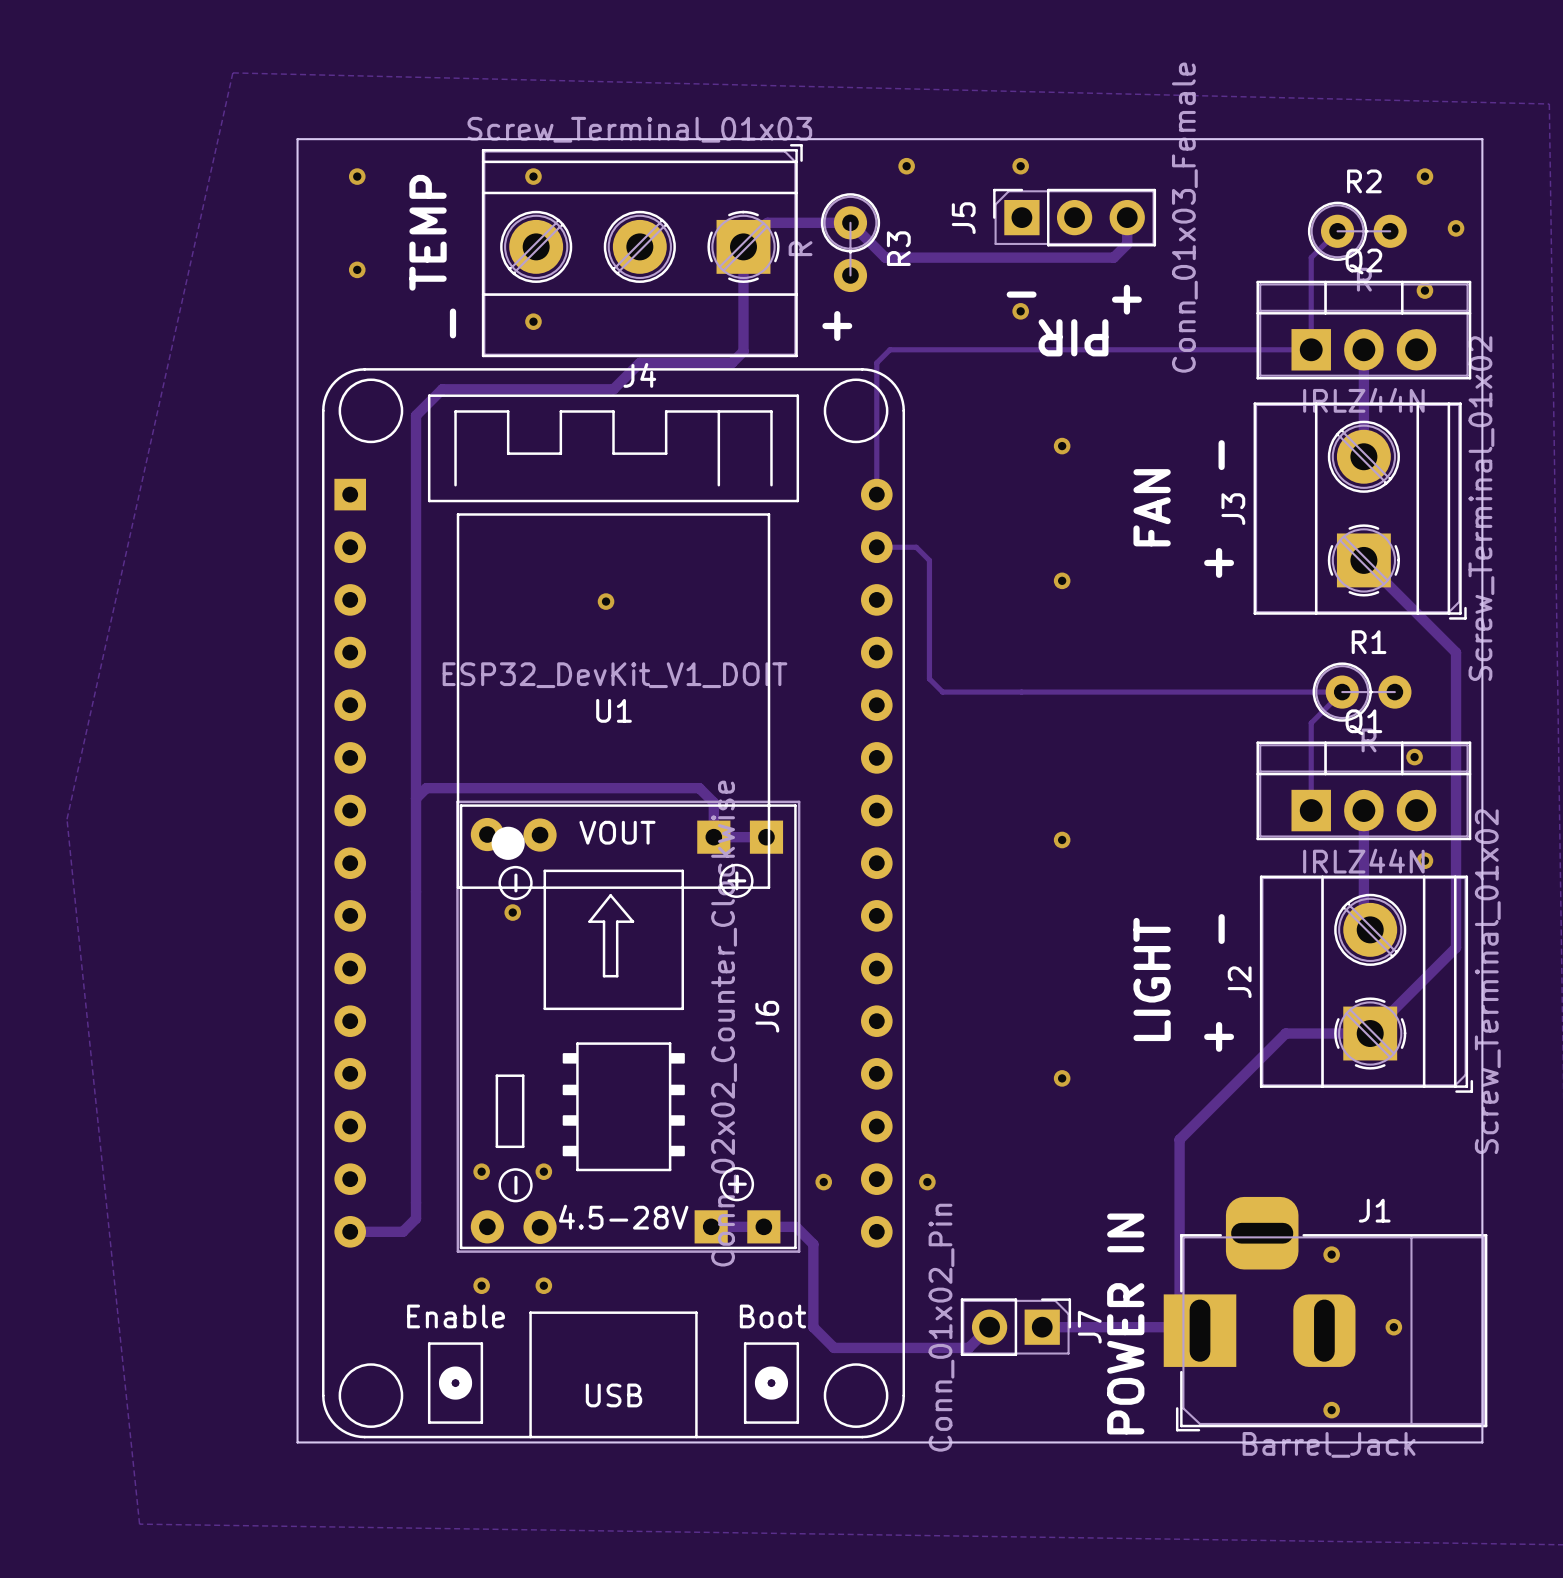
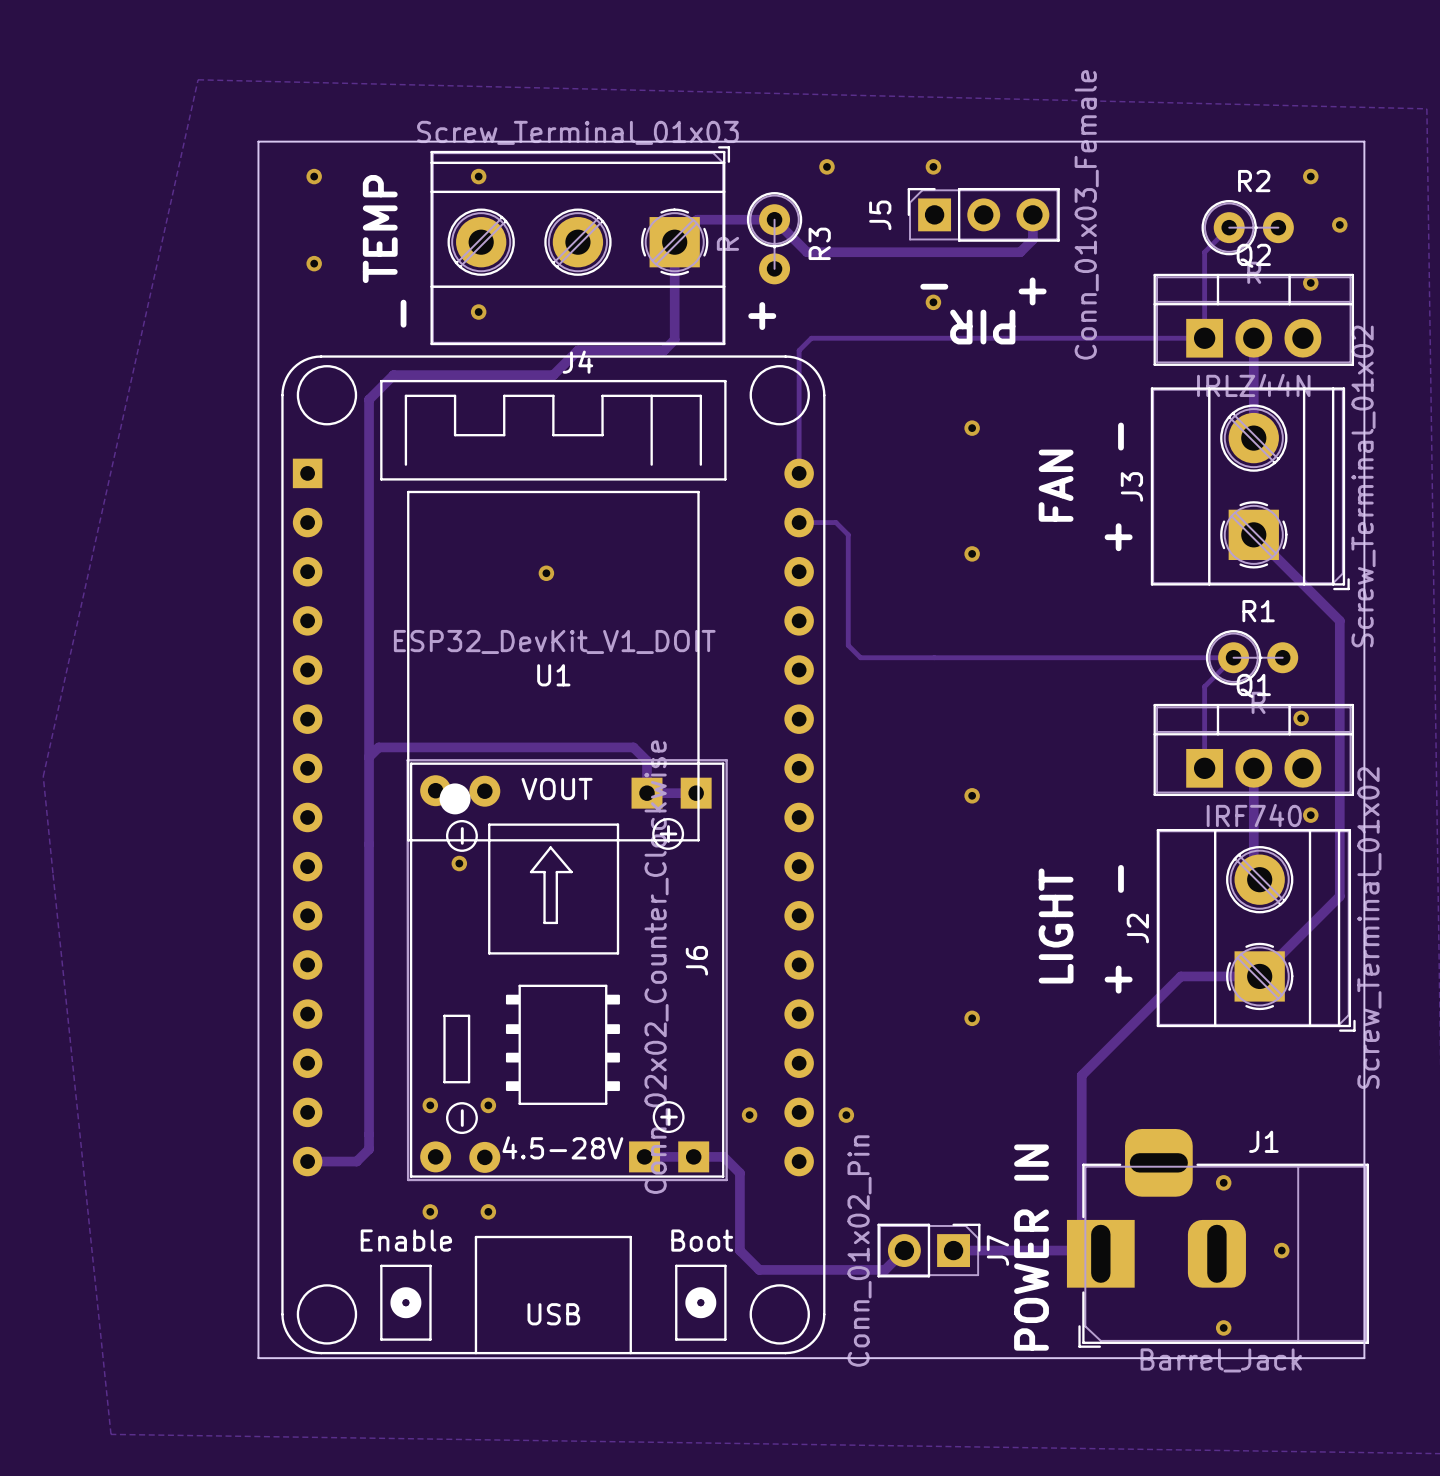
Q1 value: IRLZ44N (1363, 861) -> IRF740 (1254, 815)

